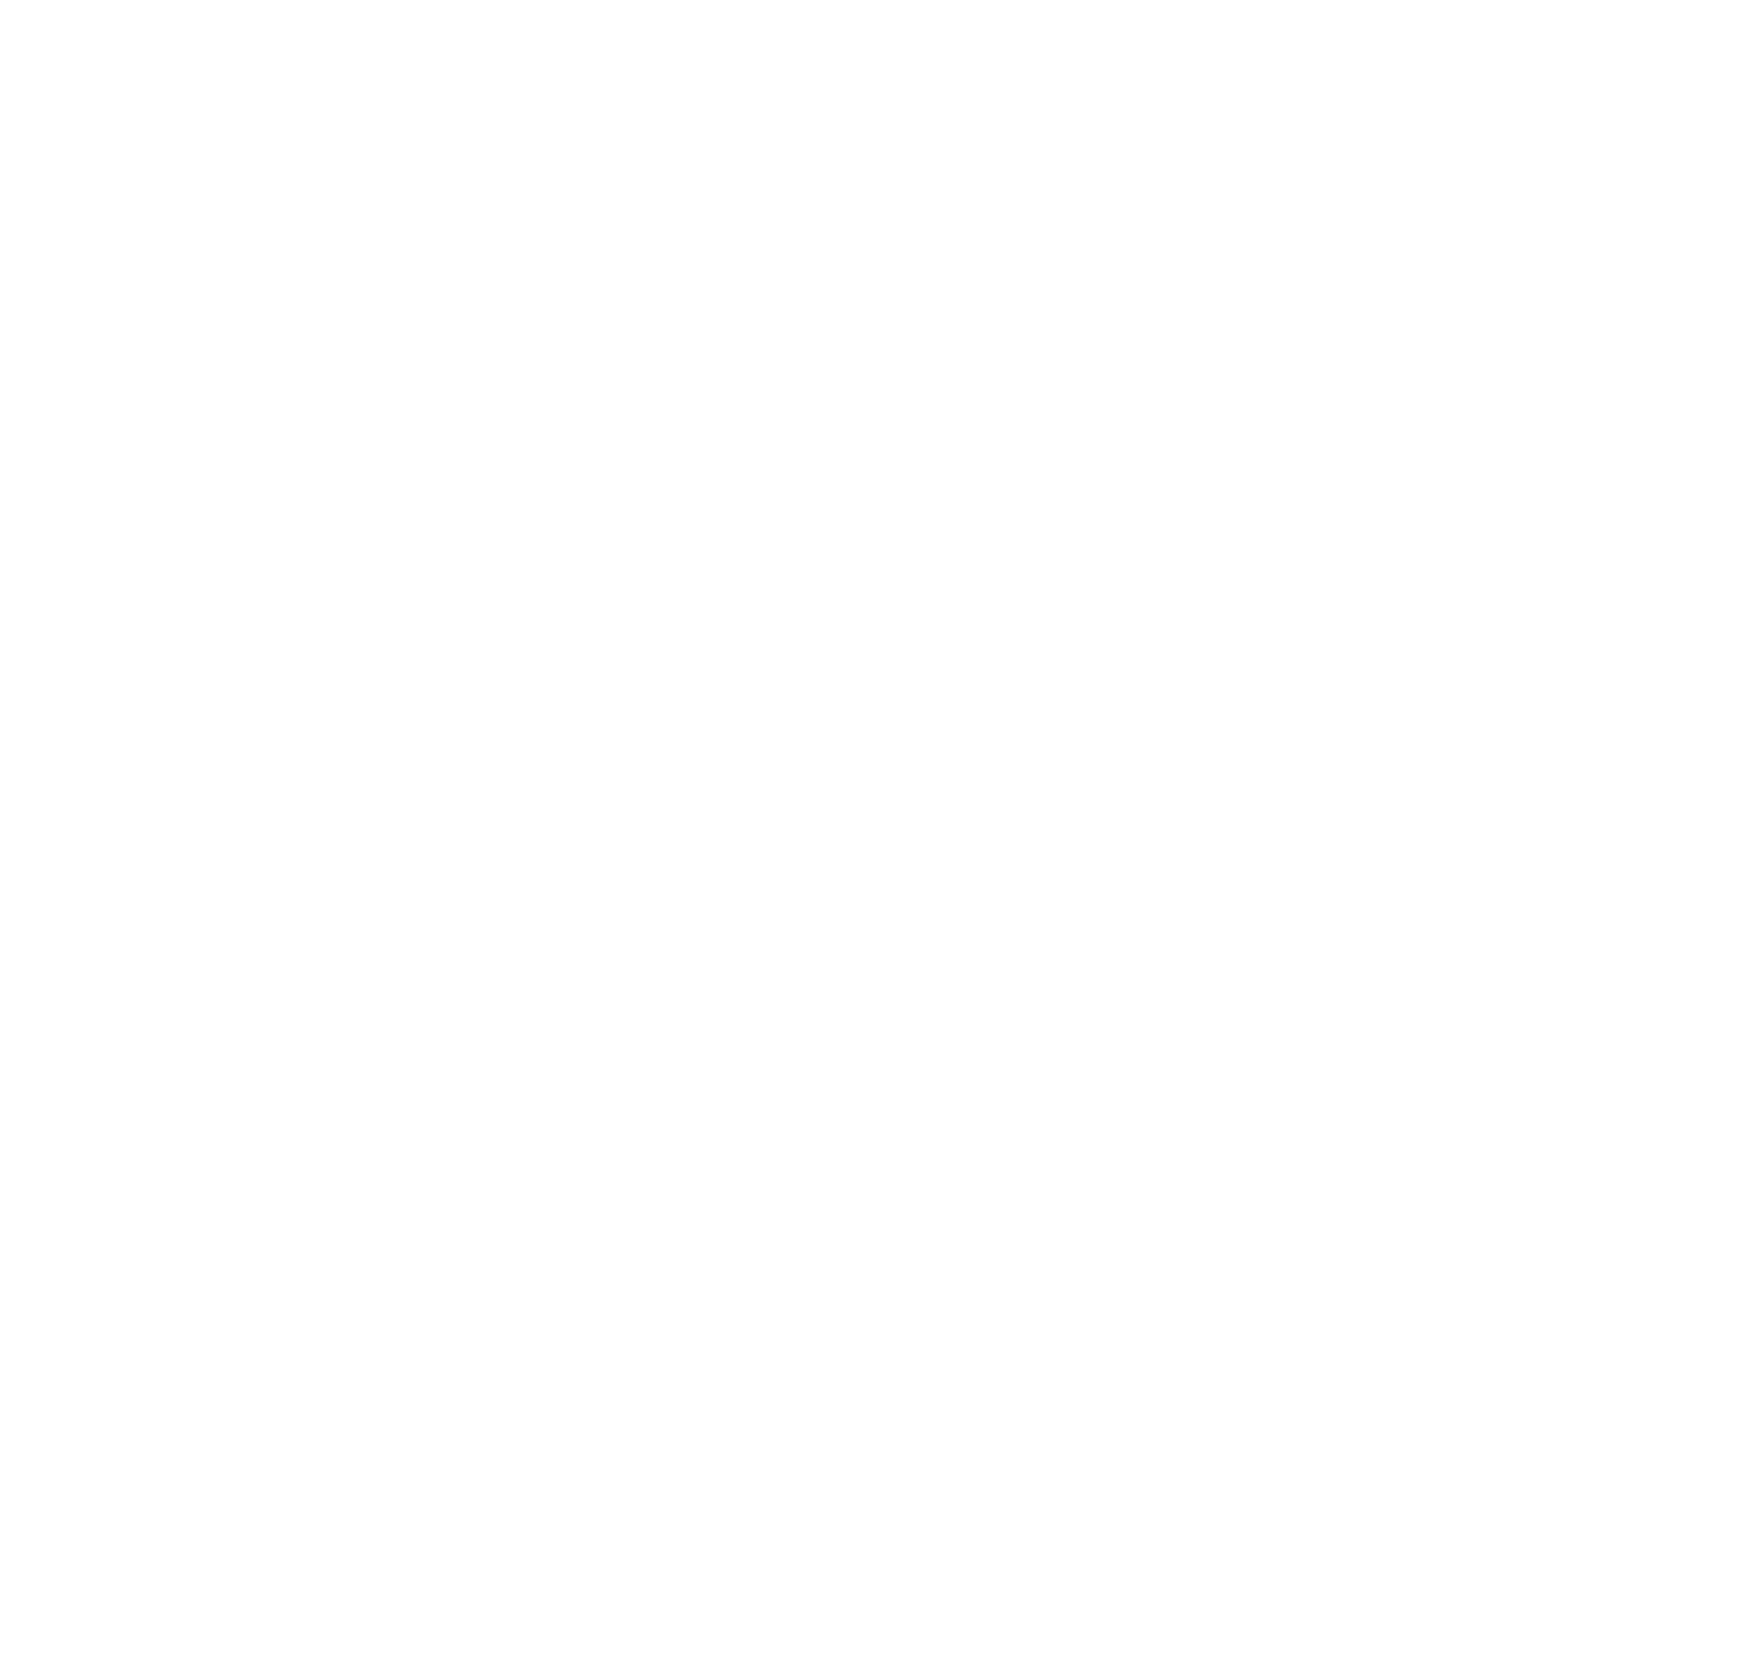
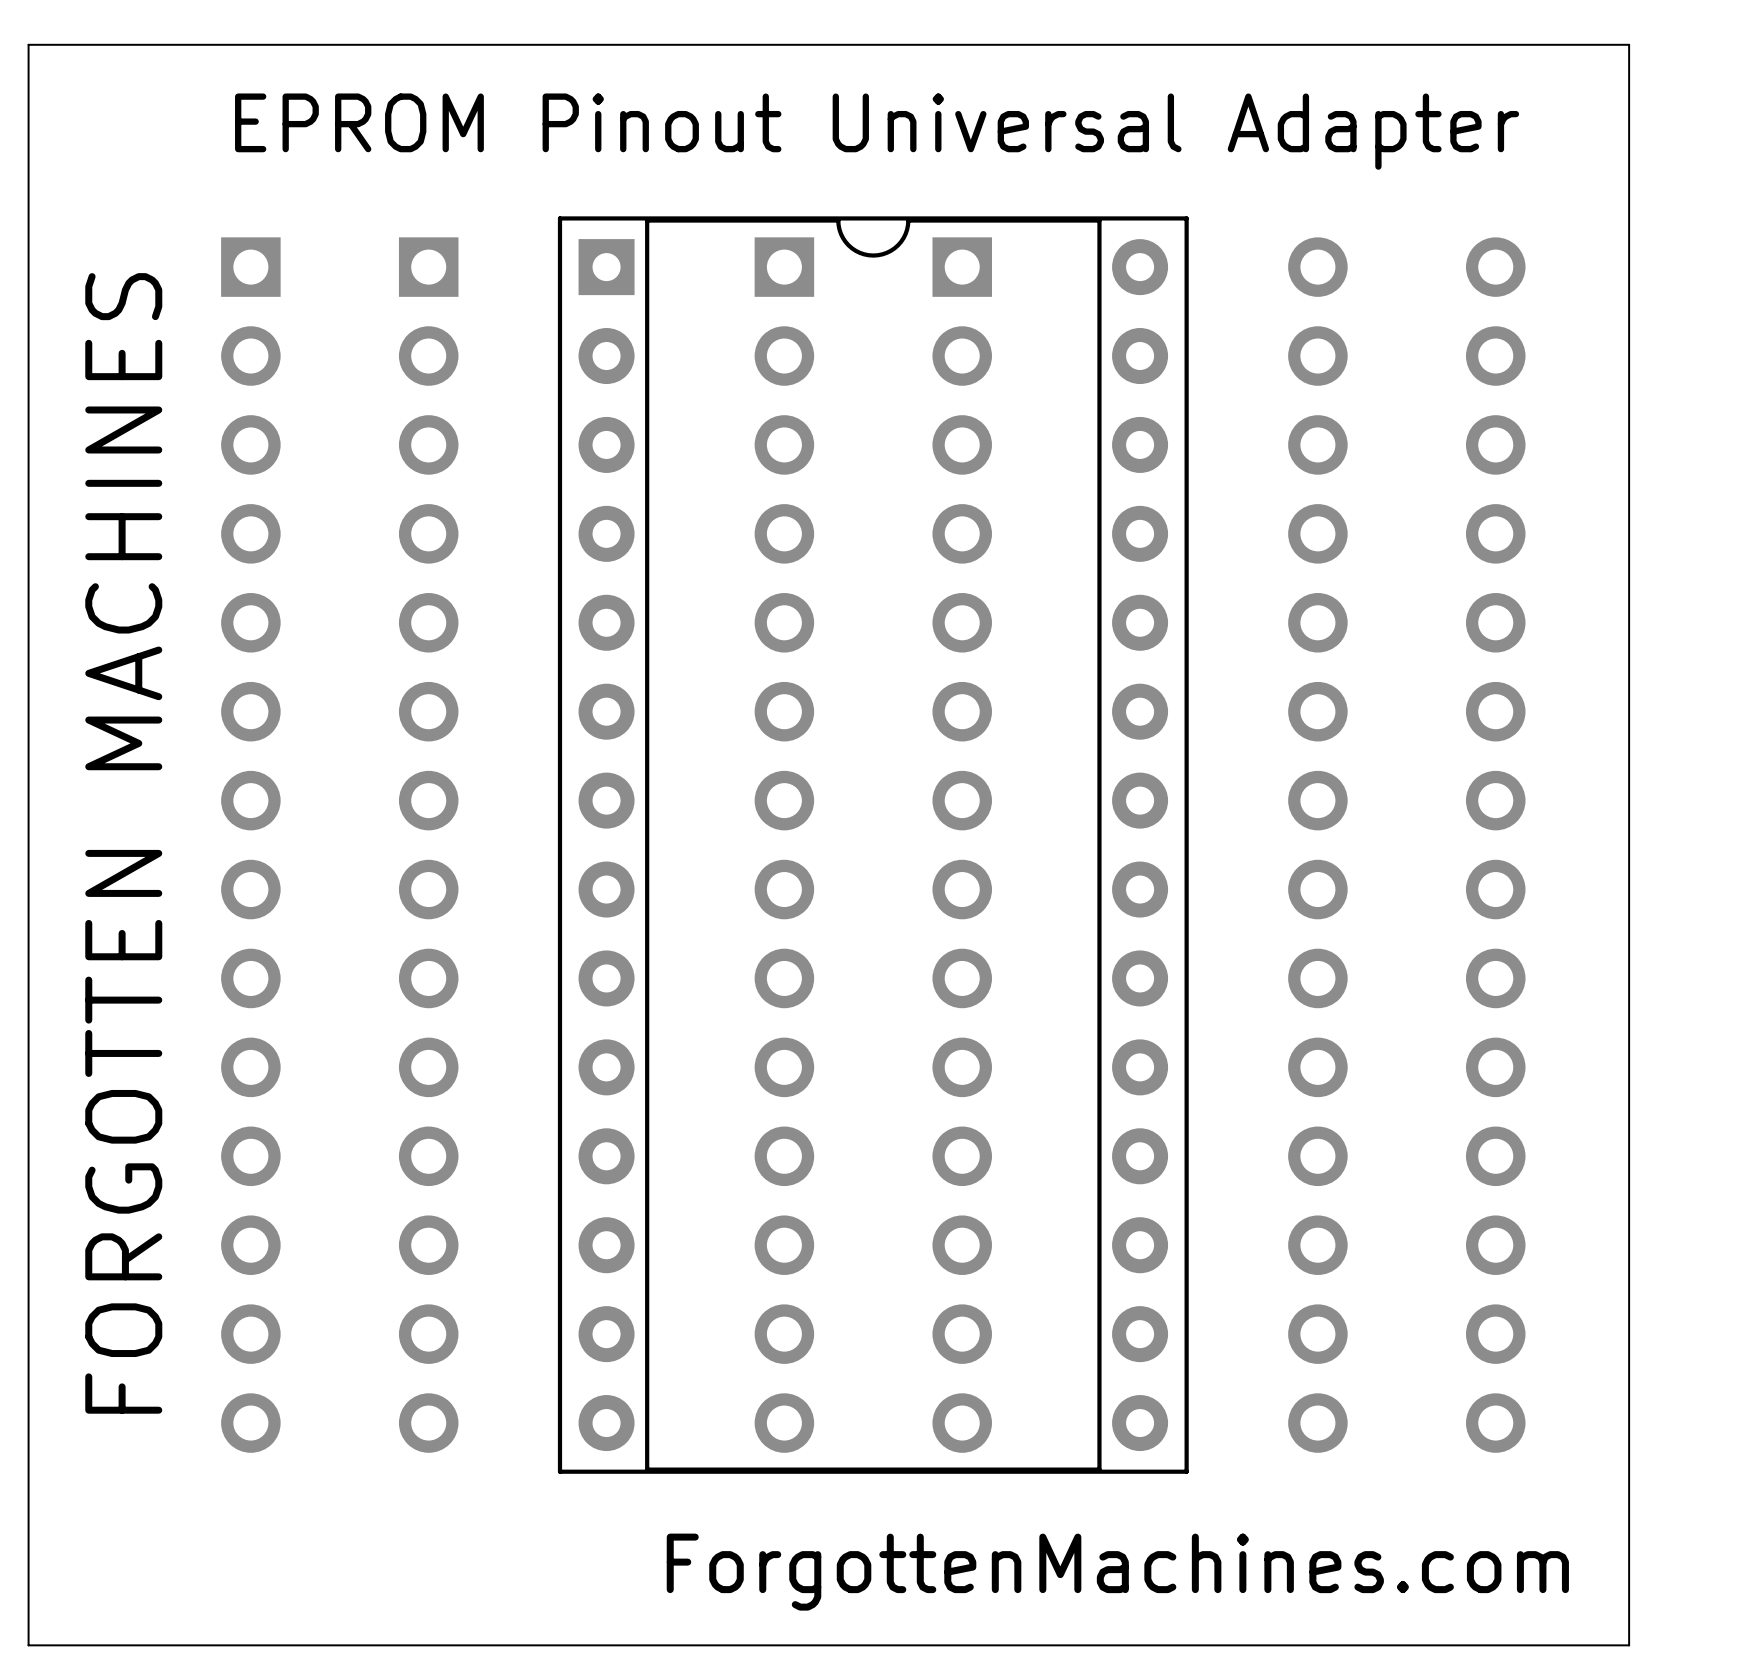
board edge: none -> (28, 44) (28, 1645) (1629, 1645) (1629, 44) (28, 44)
text: none -> EPROM Pinout Universal Adapter (877, 131)
text: none -> FORGOTTEN MACHINES (123, 843)
part: none -> (250, 845)
part: none -> (428, 845)
part: none -> (784, 845)
part: none -> (873, 845)
part: none -> (962, 845)
part: none -> (1317, 845)
part: none -> (1495, 845)
text: none -> ForgottenMachines.com (1117, 1572)

